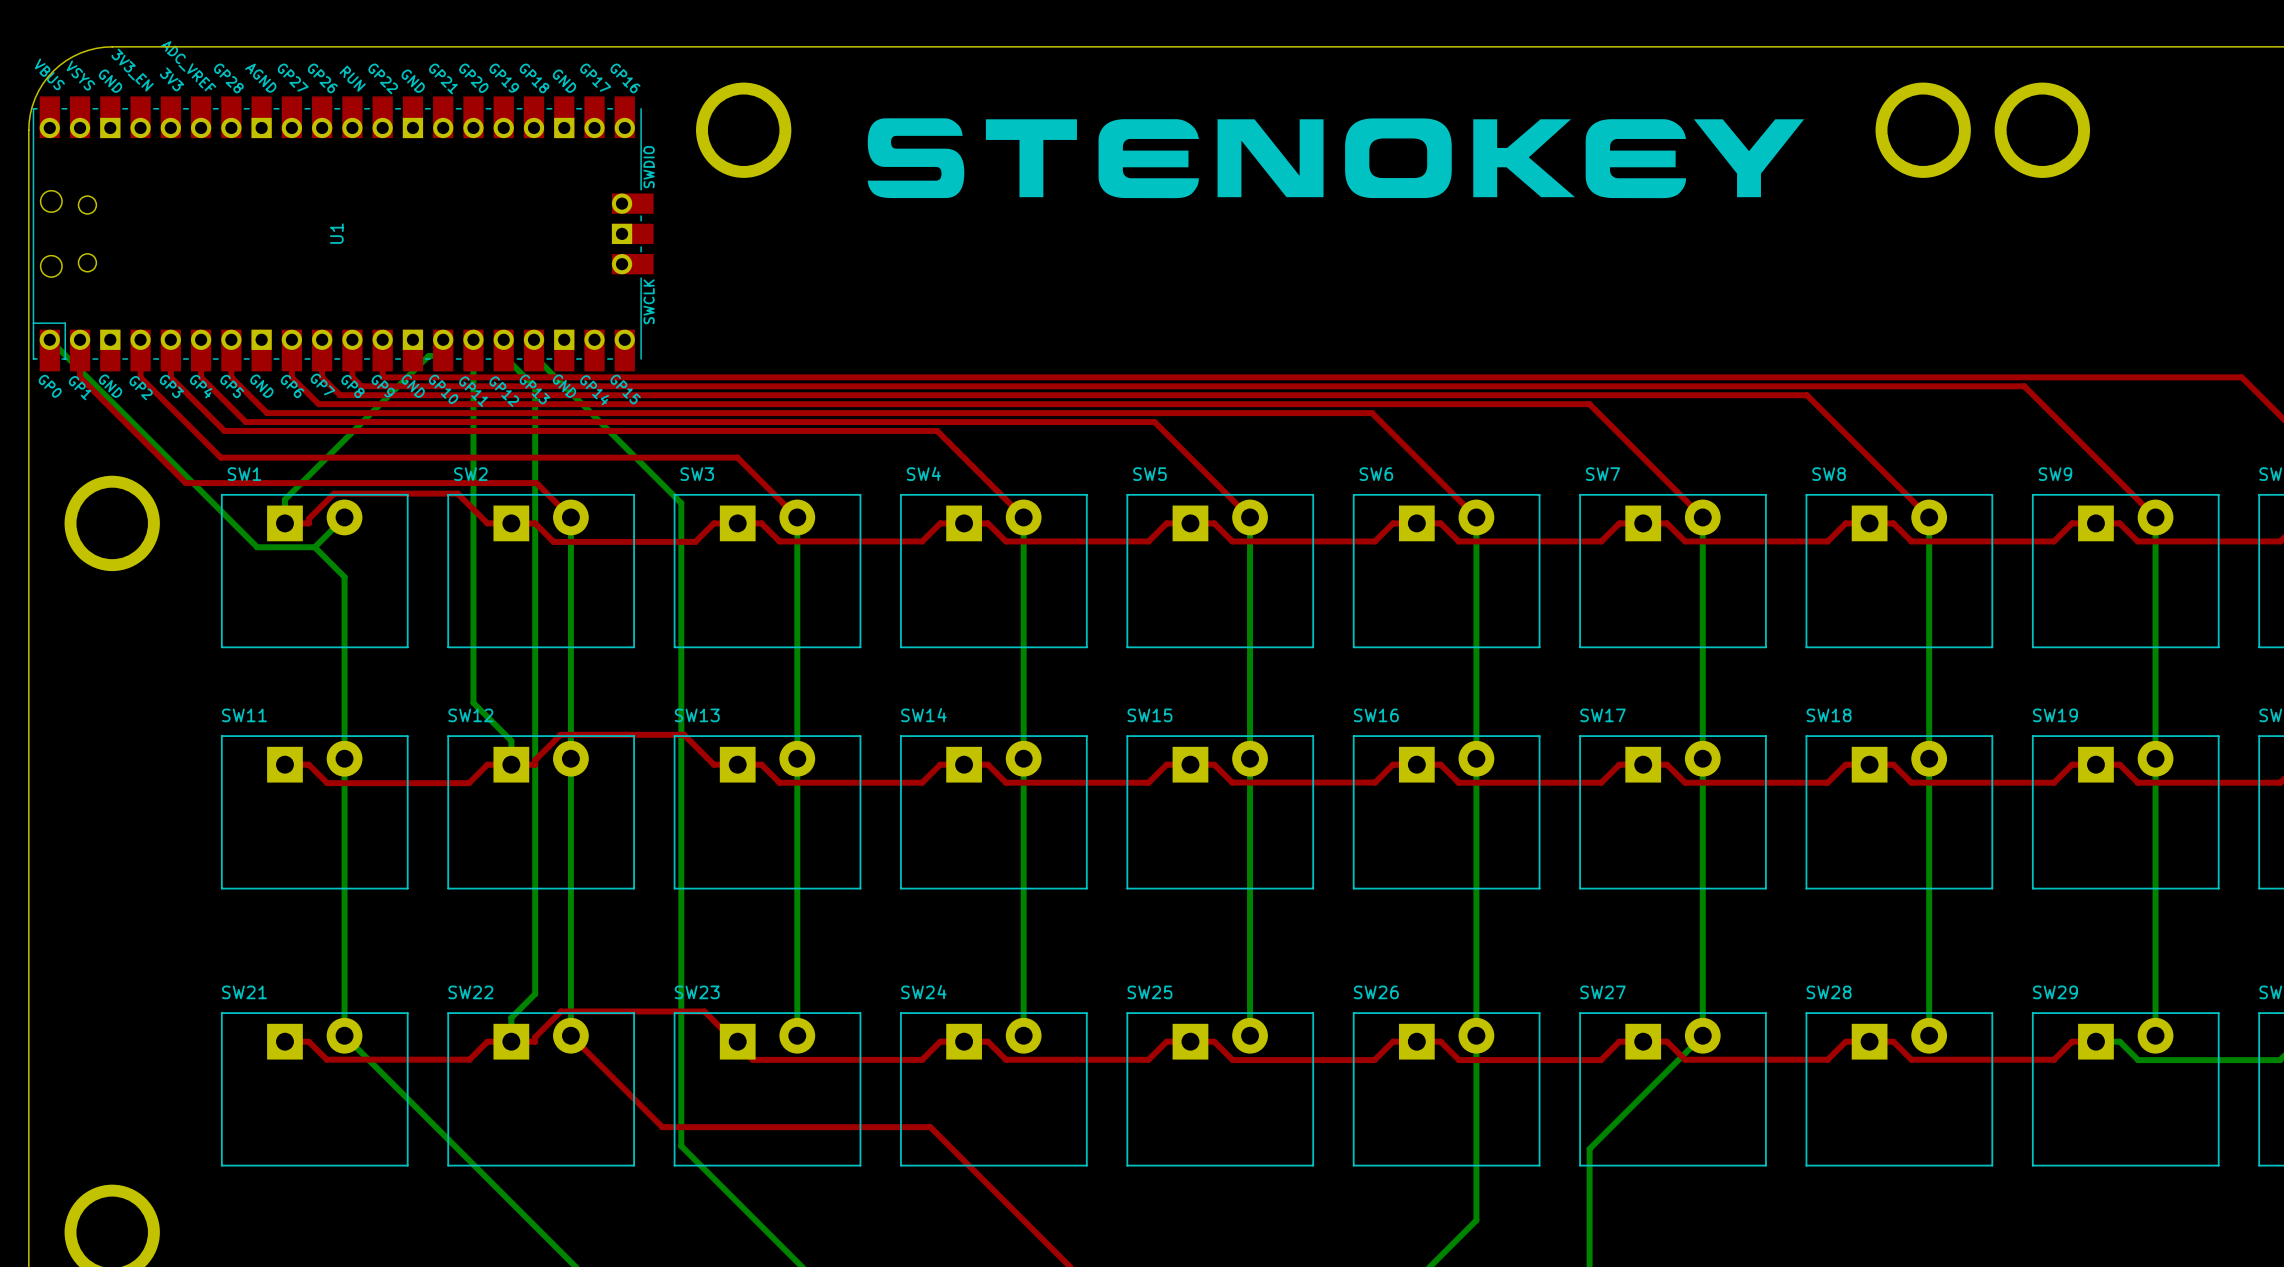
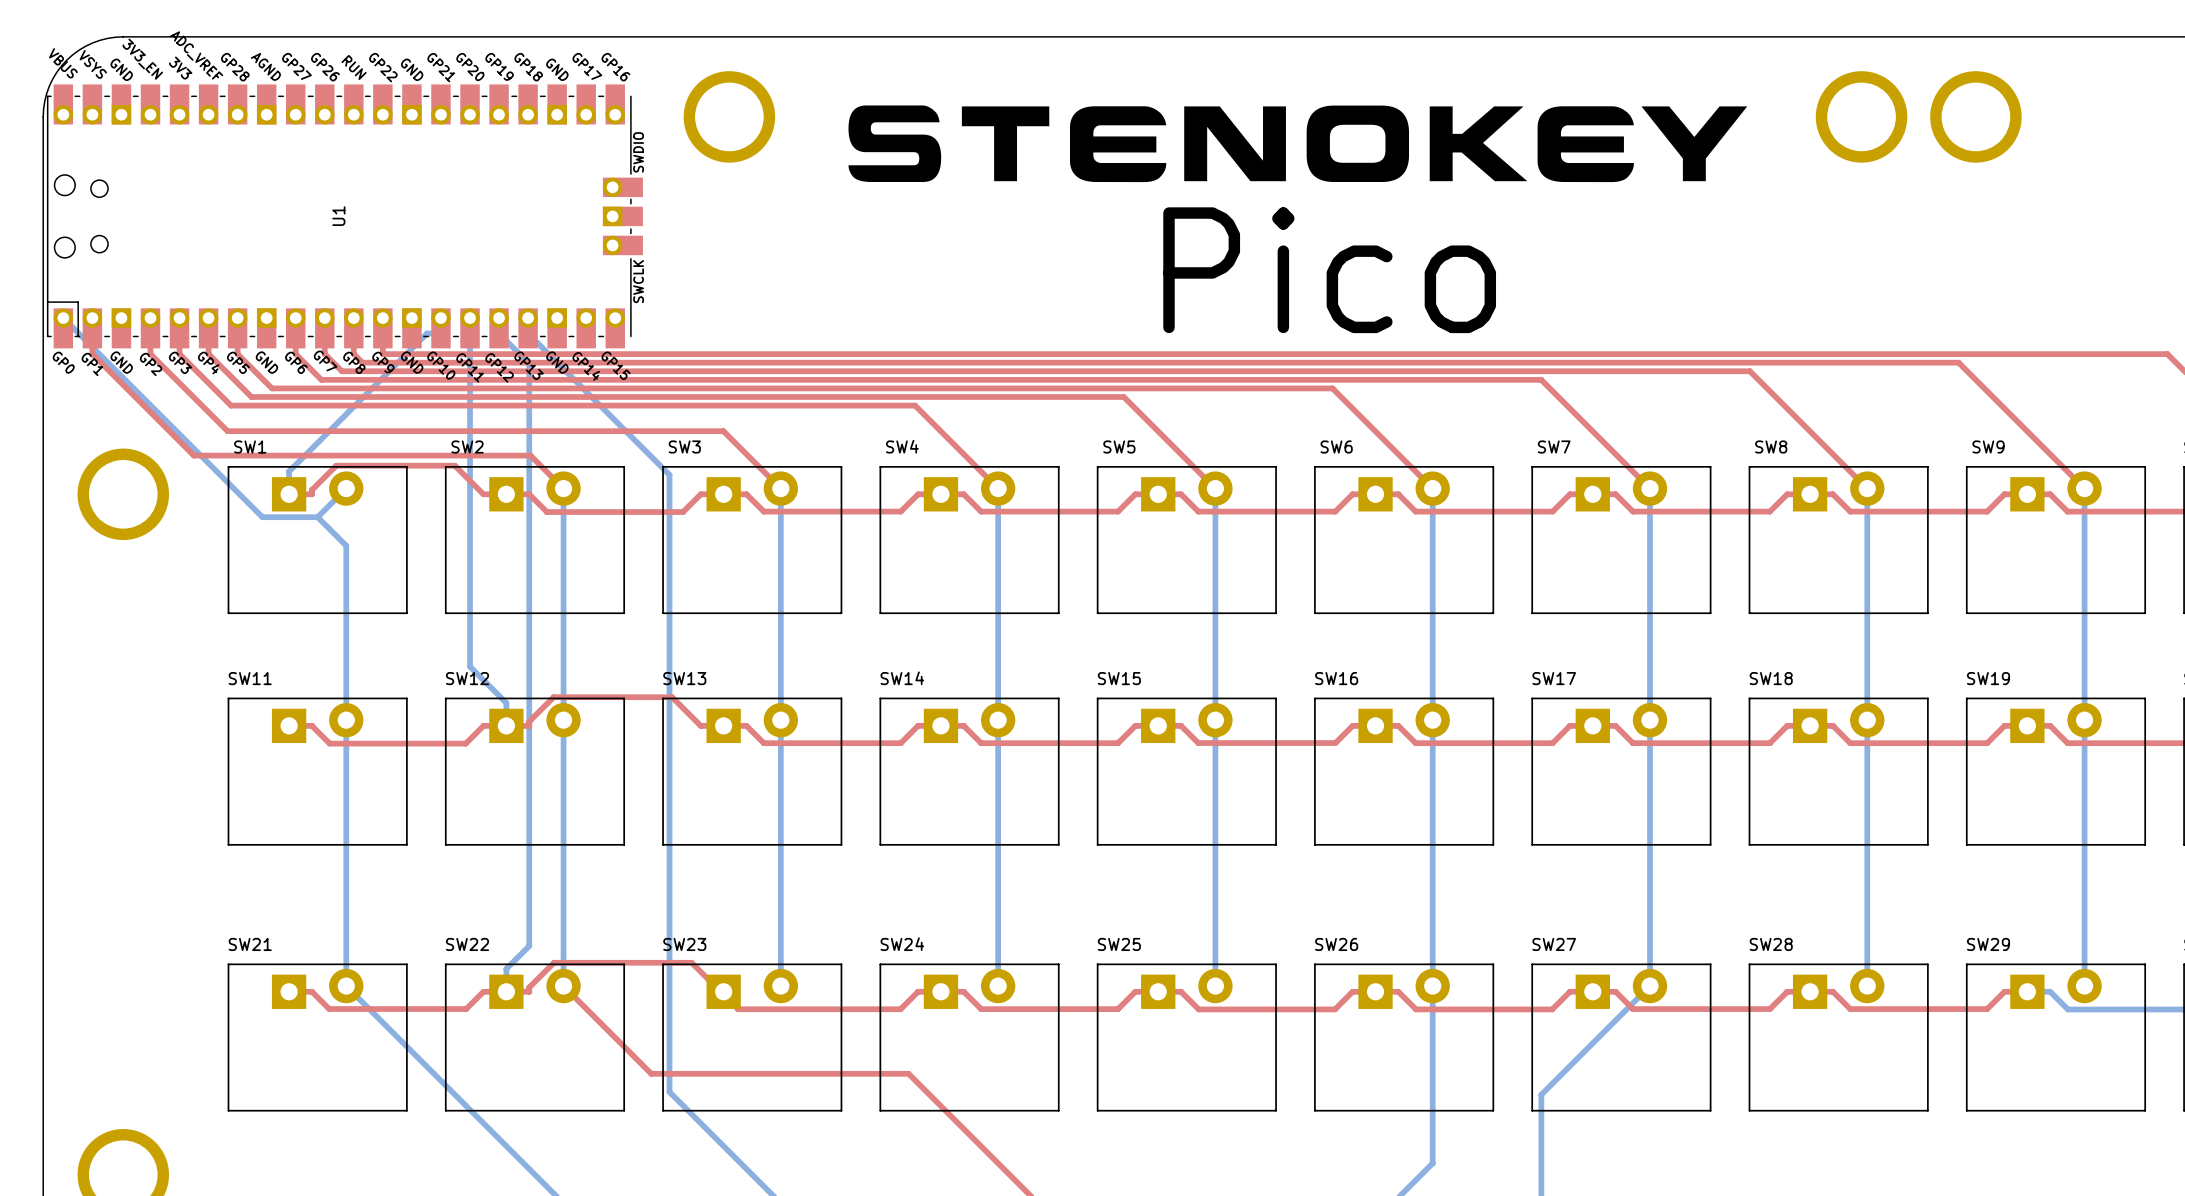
text: none -> Pico (1329, 270)

